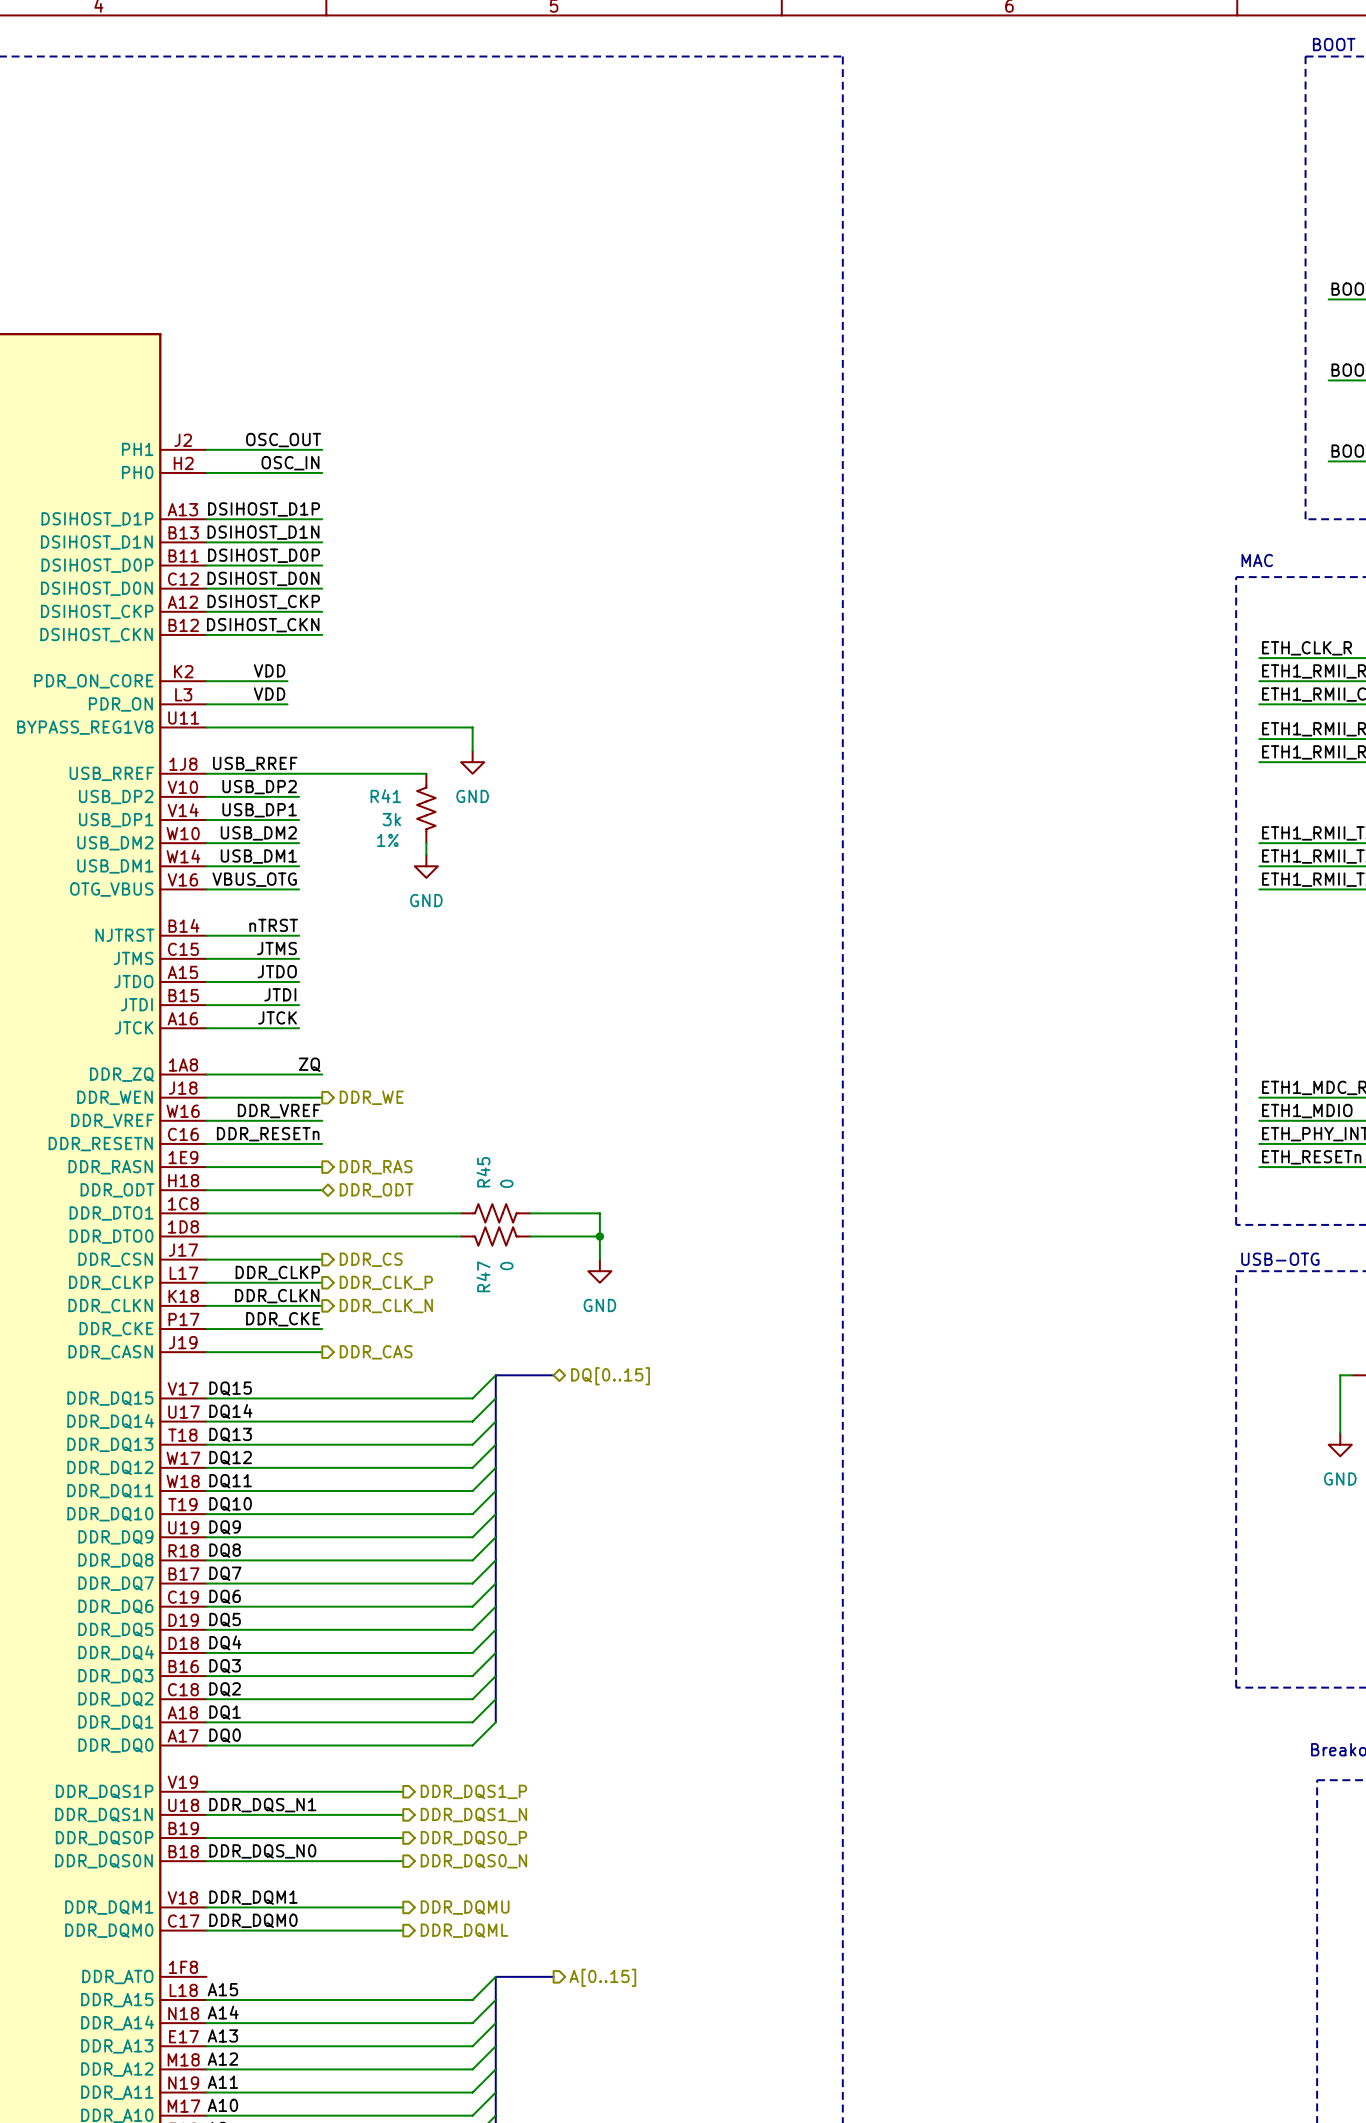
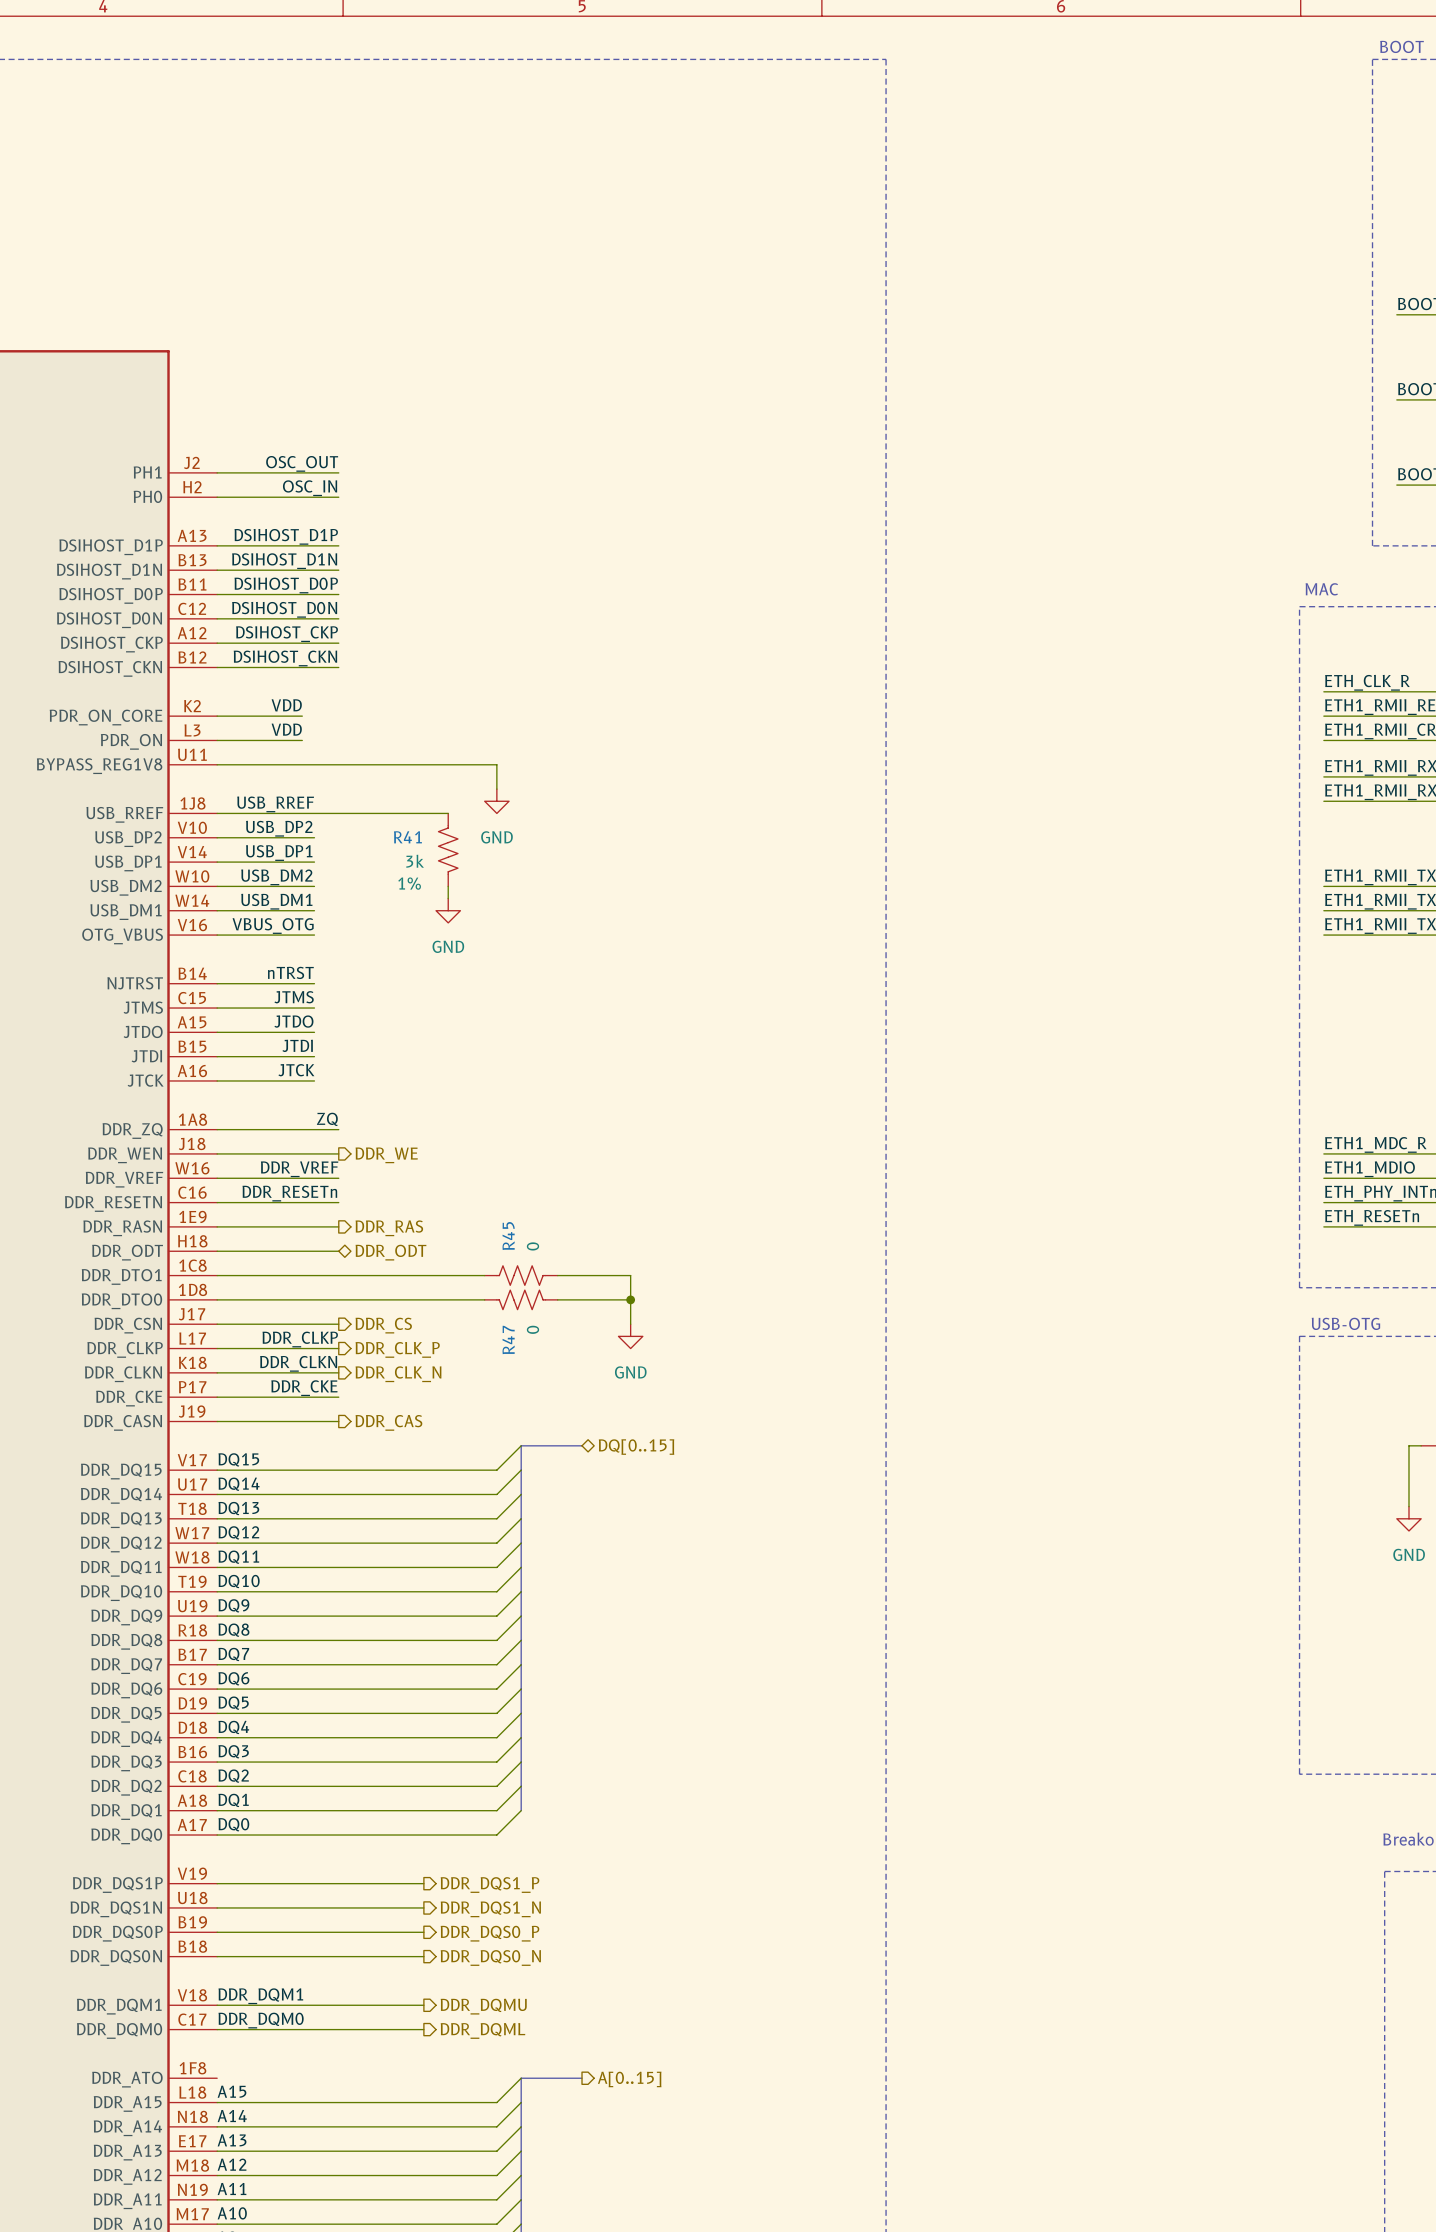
label: DDR_DQS_N1 (262, 1805) -> none
label: DDR_DQS_N0 (262, 1851) -> none

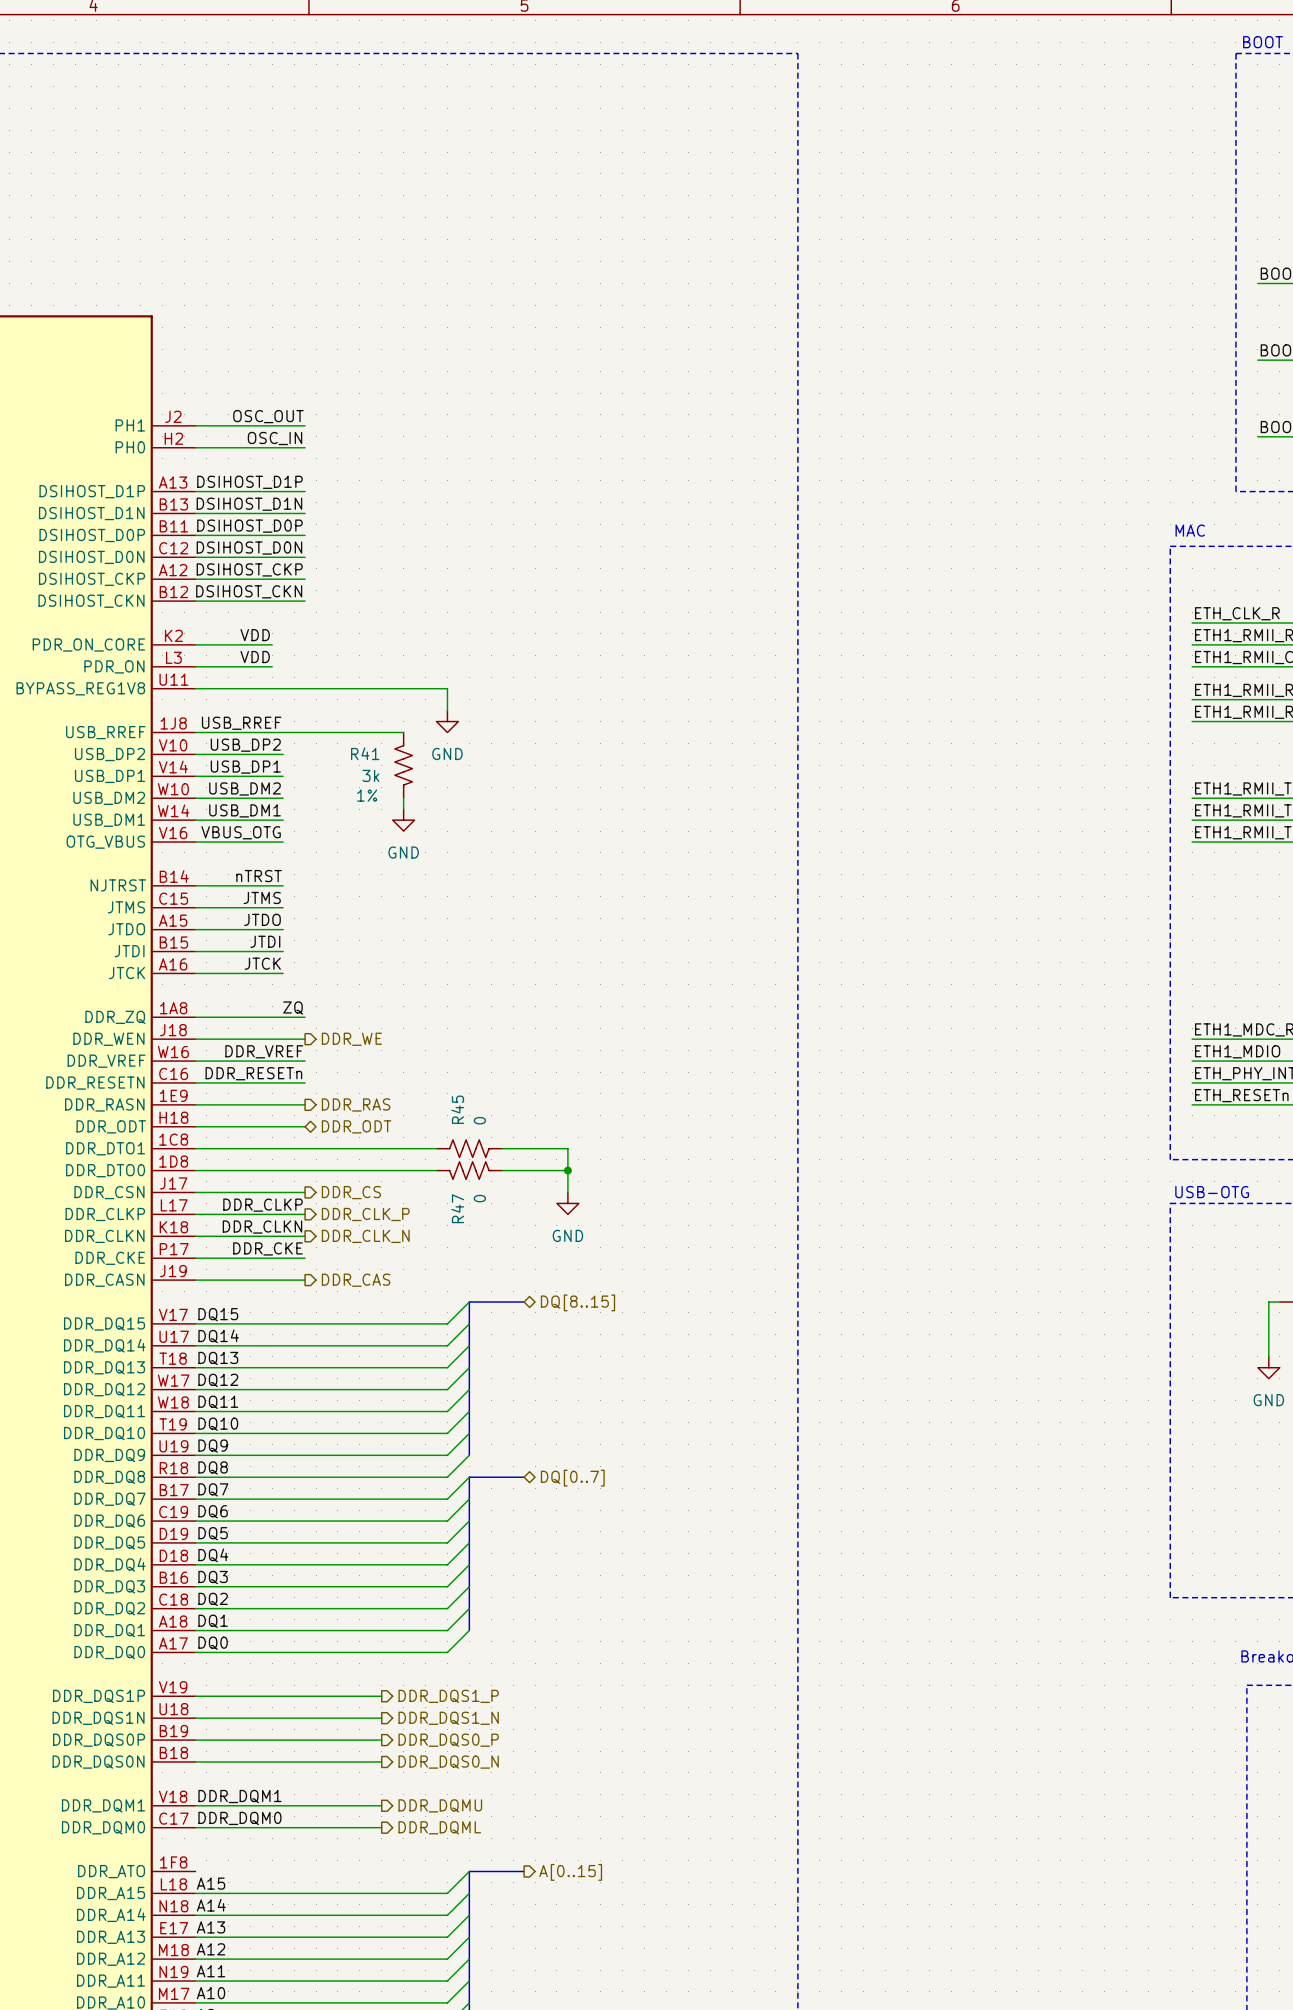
hierarchical label: DQ[0..15] (636, 1447) -> DQ[8..15] (577, 1302)
bus: (521, 1616) (521, 1640) -> (524, 1477) (469, 1477)
hierarchical label: none -> DQ[0..7] (572, 1478)

